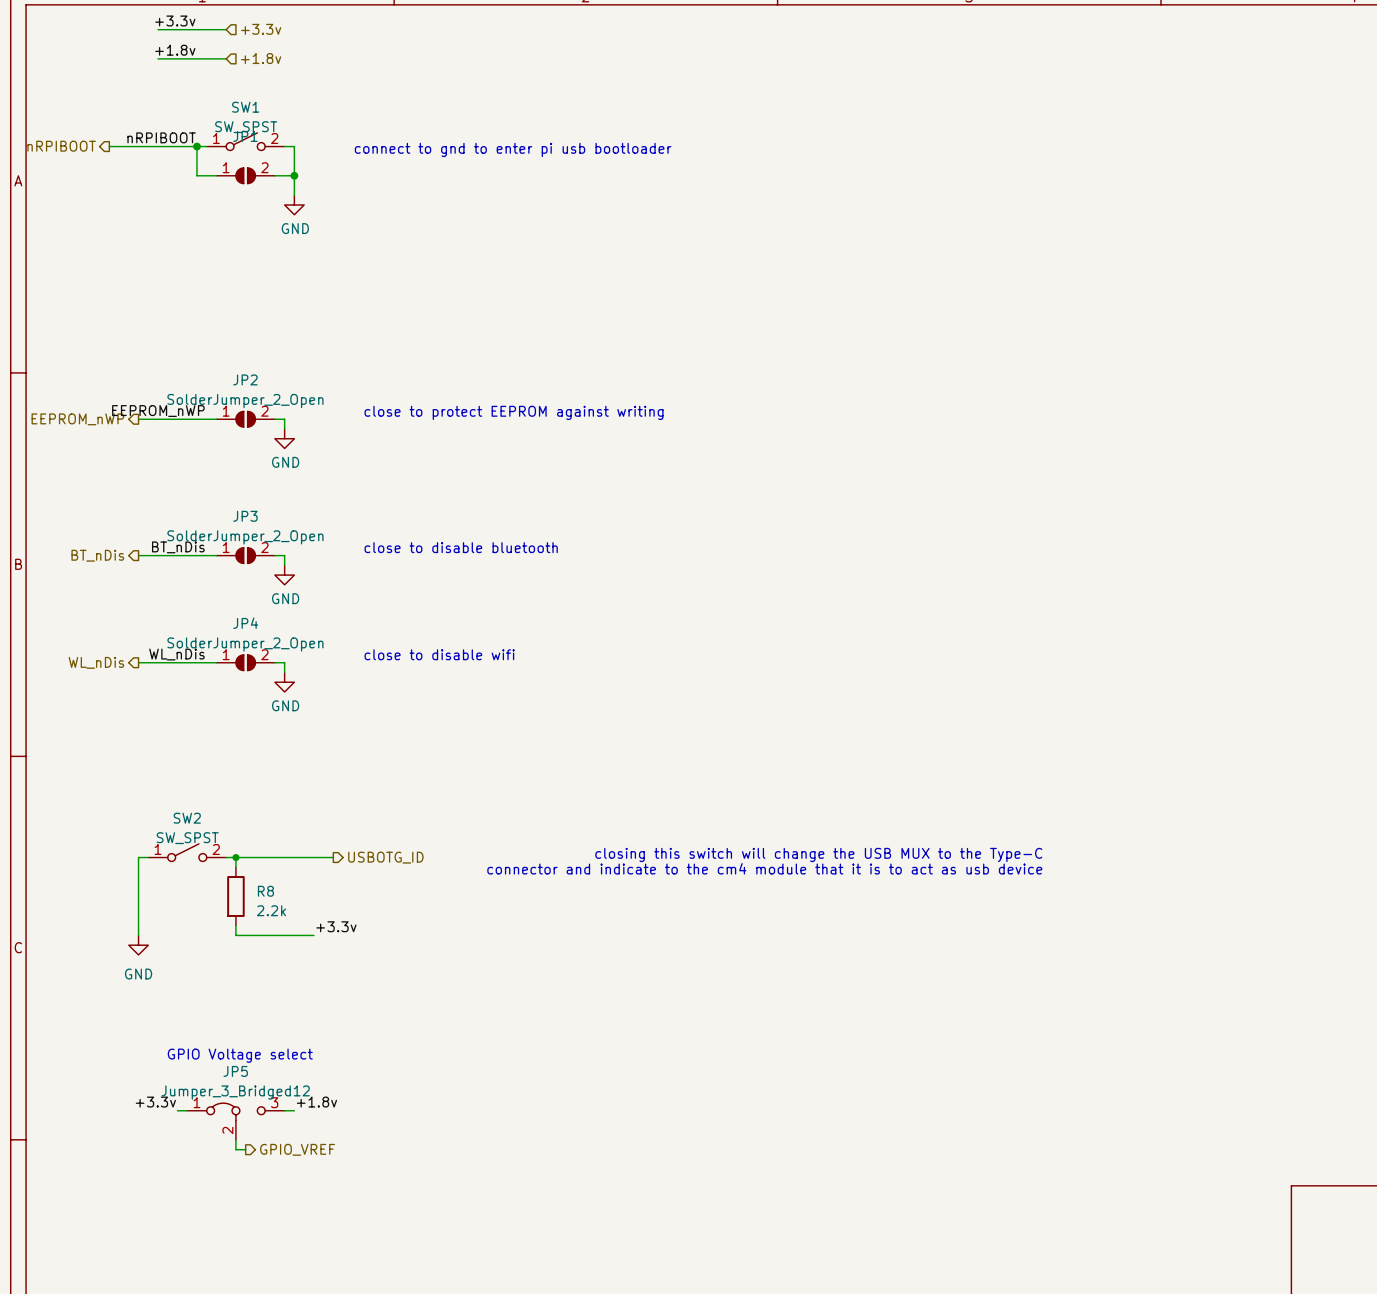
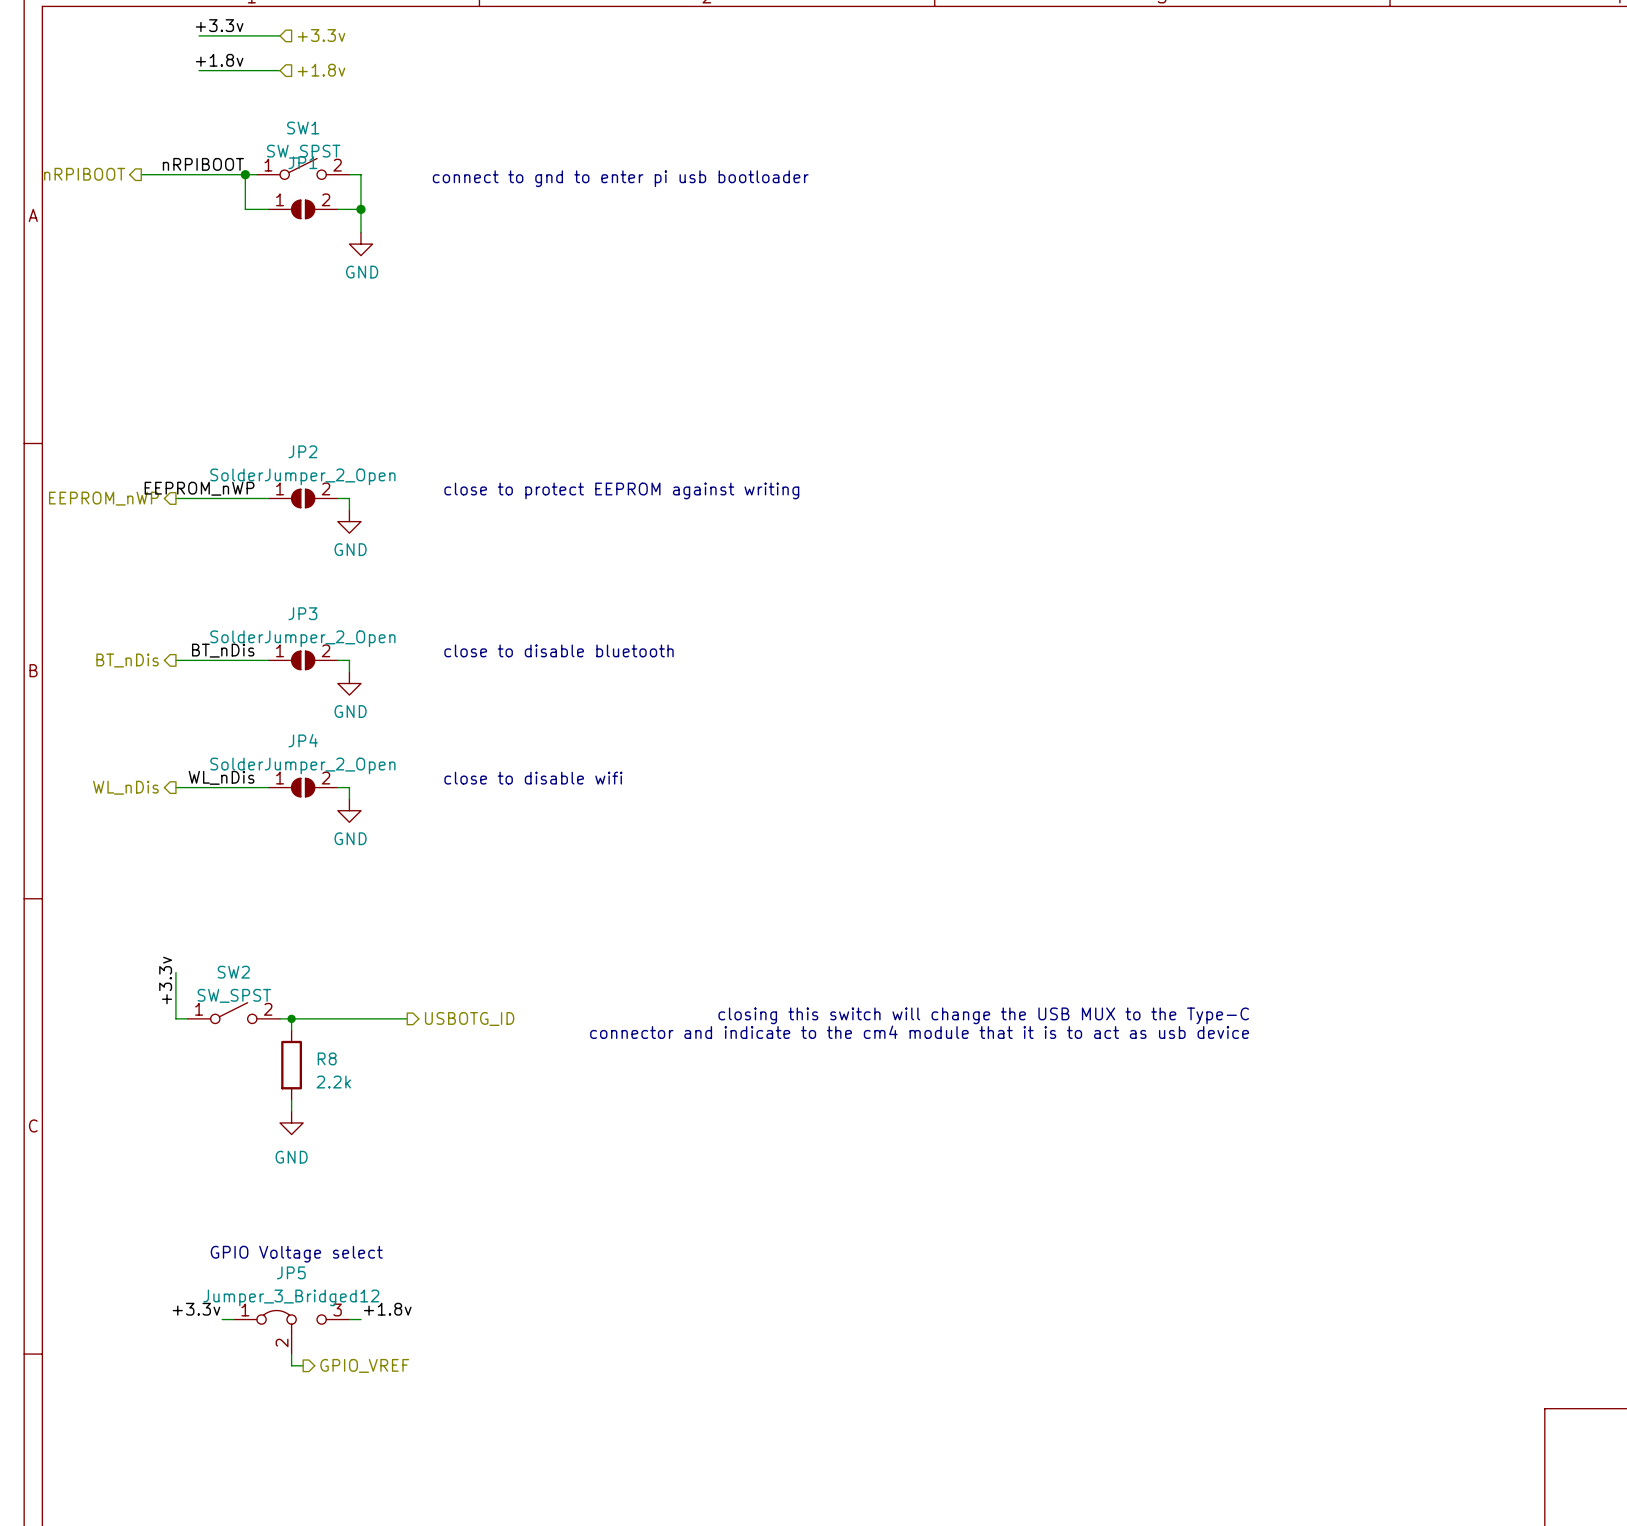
label: none -> +3.3v (165, 980)
wire: (138, 857) (138, 935) -> (175, 1018) (175, 972)
label: +3.3v (336, 926) -> none
wire: (235, 935) (313, 935) -> none
power symbol position: GND (138, 945) -> GND (291, 1122)

